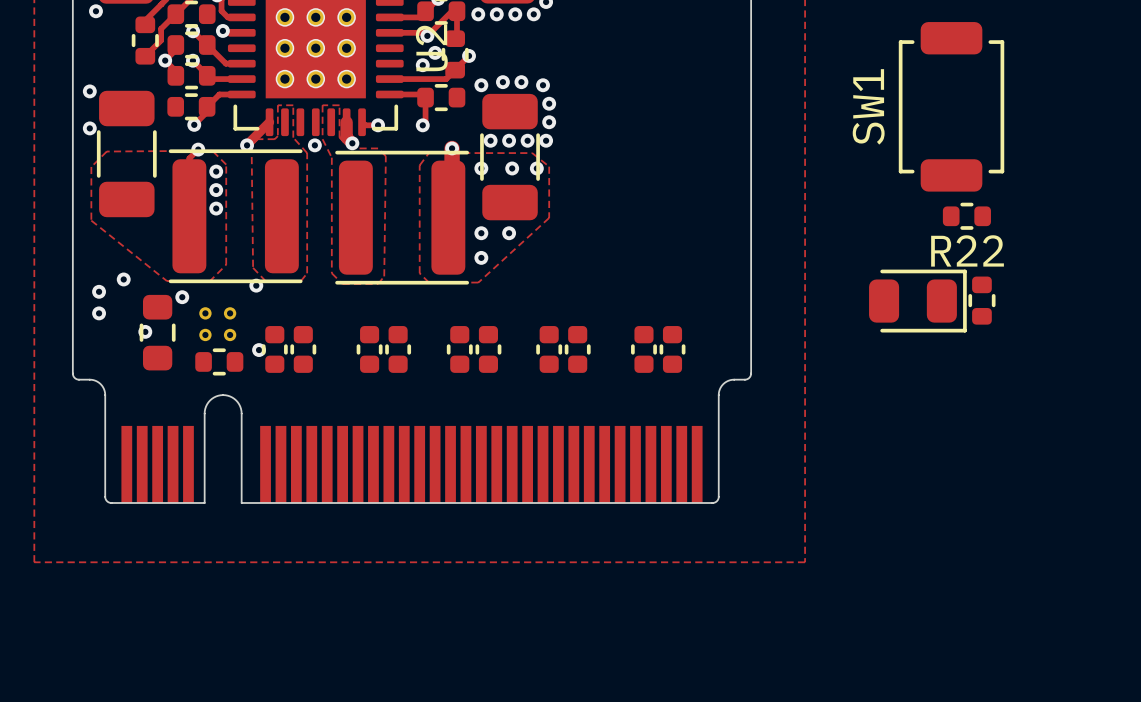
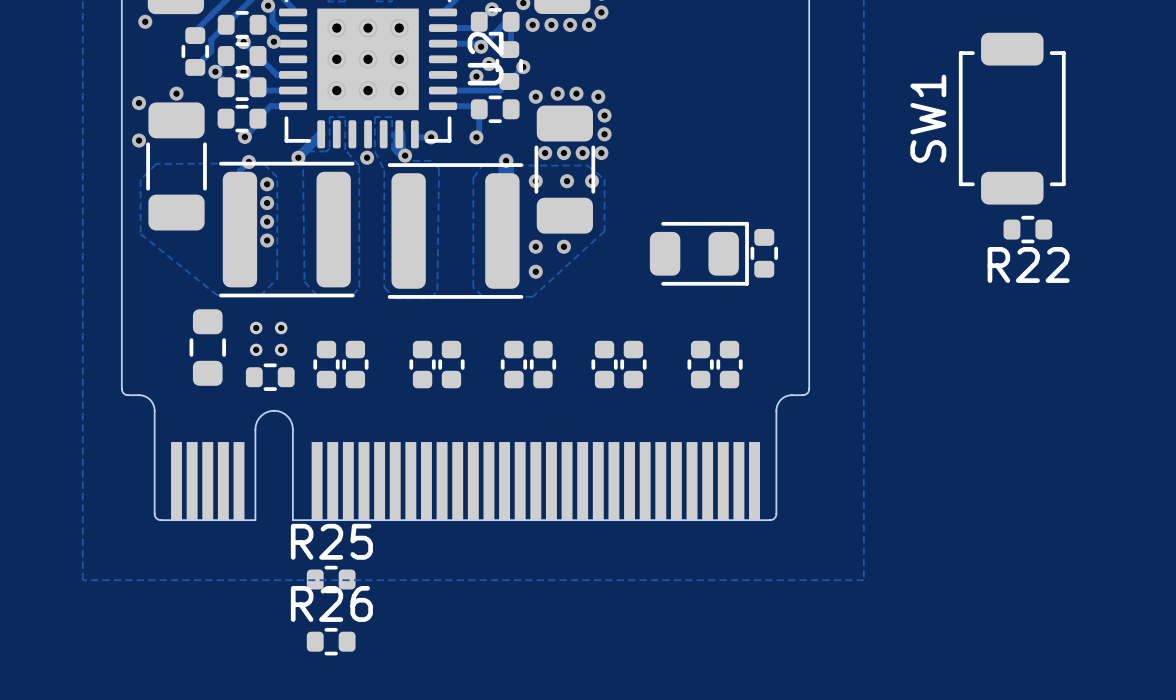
via: none -> (176, 93)
via: none -> (267, 240)
via: (123, 279) -> none
via: (256, 285) -> none
via: (99, 291) -> none
via: (182, 297) -> none
part position: (981, 300) -> (764, 253)
part position: (917, 301) -> (699, 253)
via: (99, 313) -> none
via: (145, 331) -> none
via: (259, 350) -> none
R25: none -> (331, 579)
R26: none -> (331, 641)

